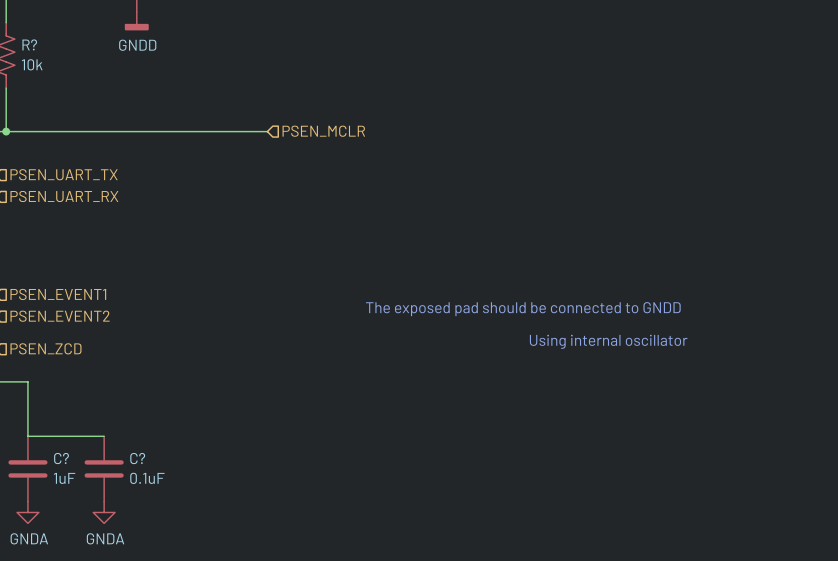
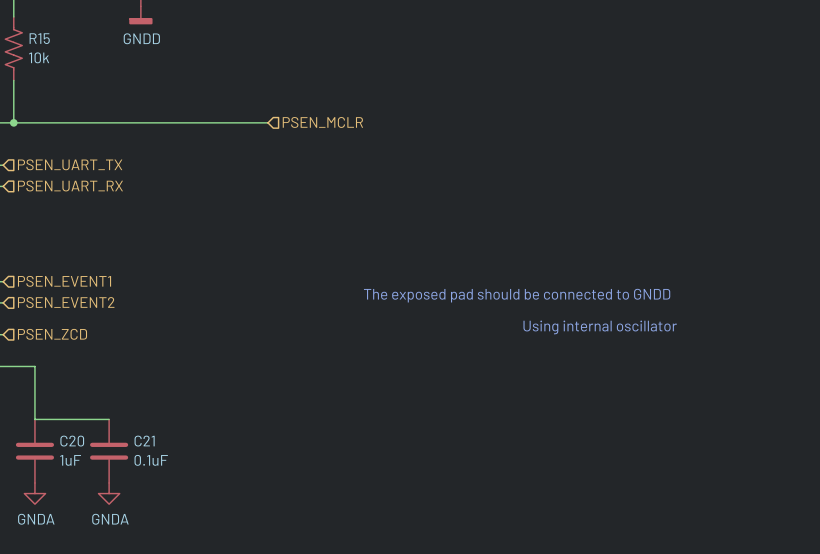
R? name: R? (29, 44) -> R15 (39, 38)
C? name: C? (61, 458) -> C20 (72, 441)
C? name: C? (137, 458) -> C21 (144, 441)

